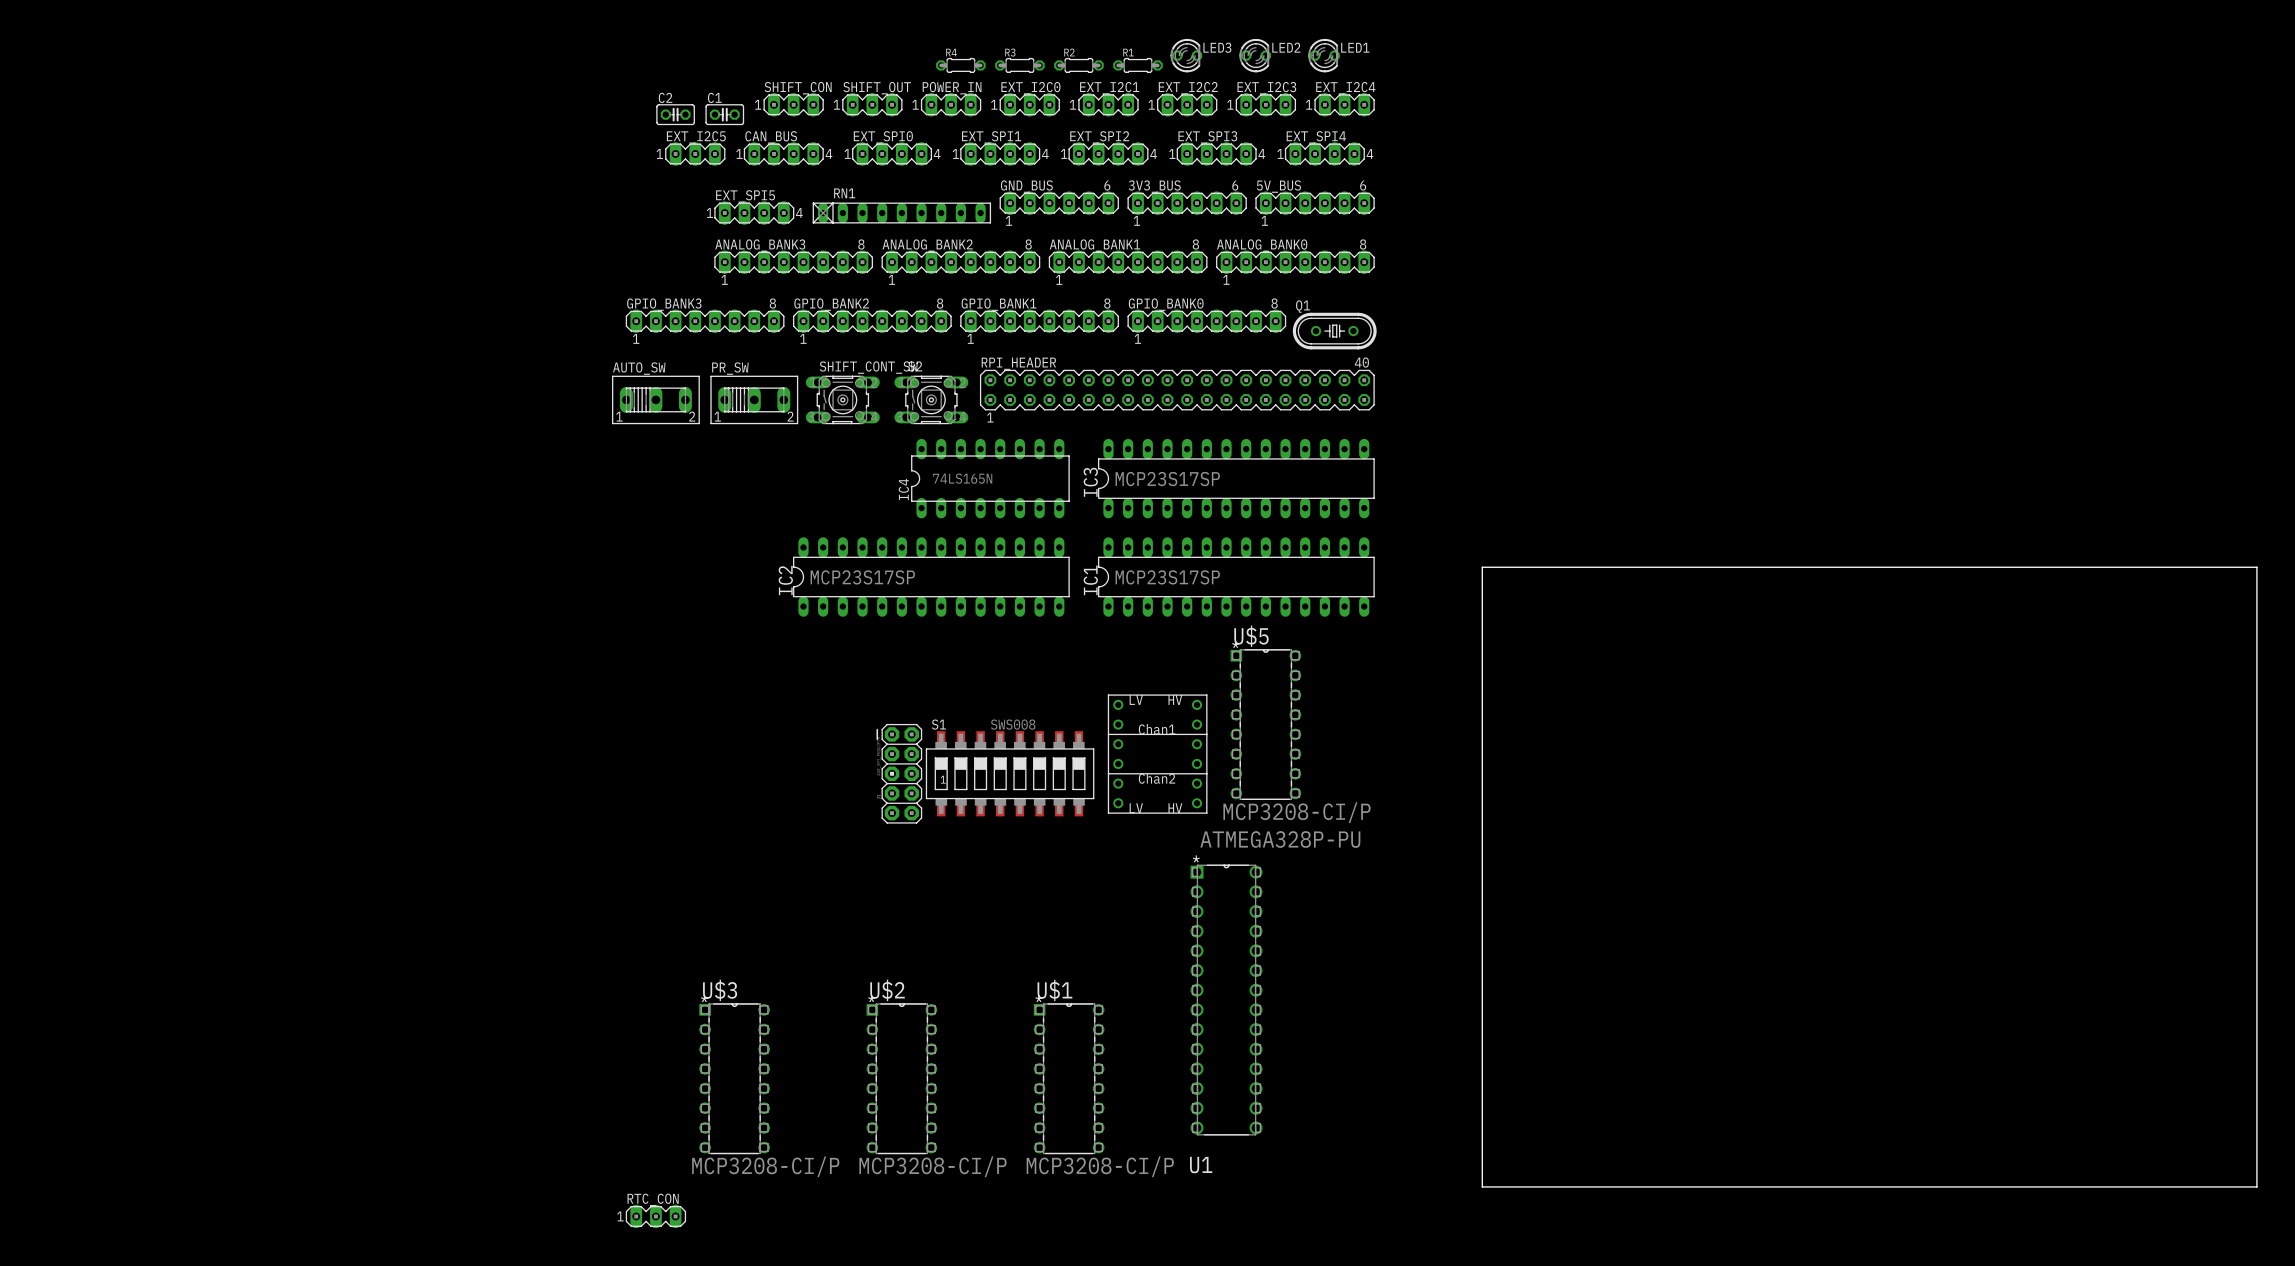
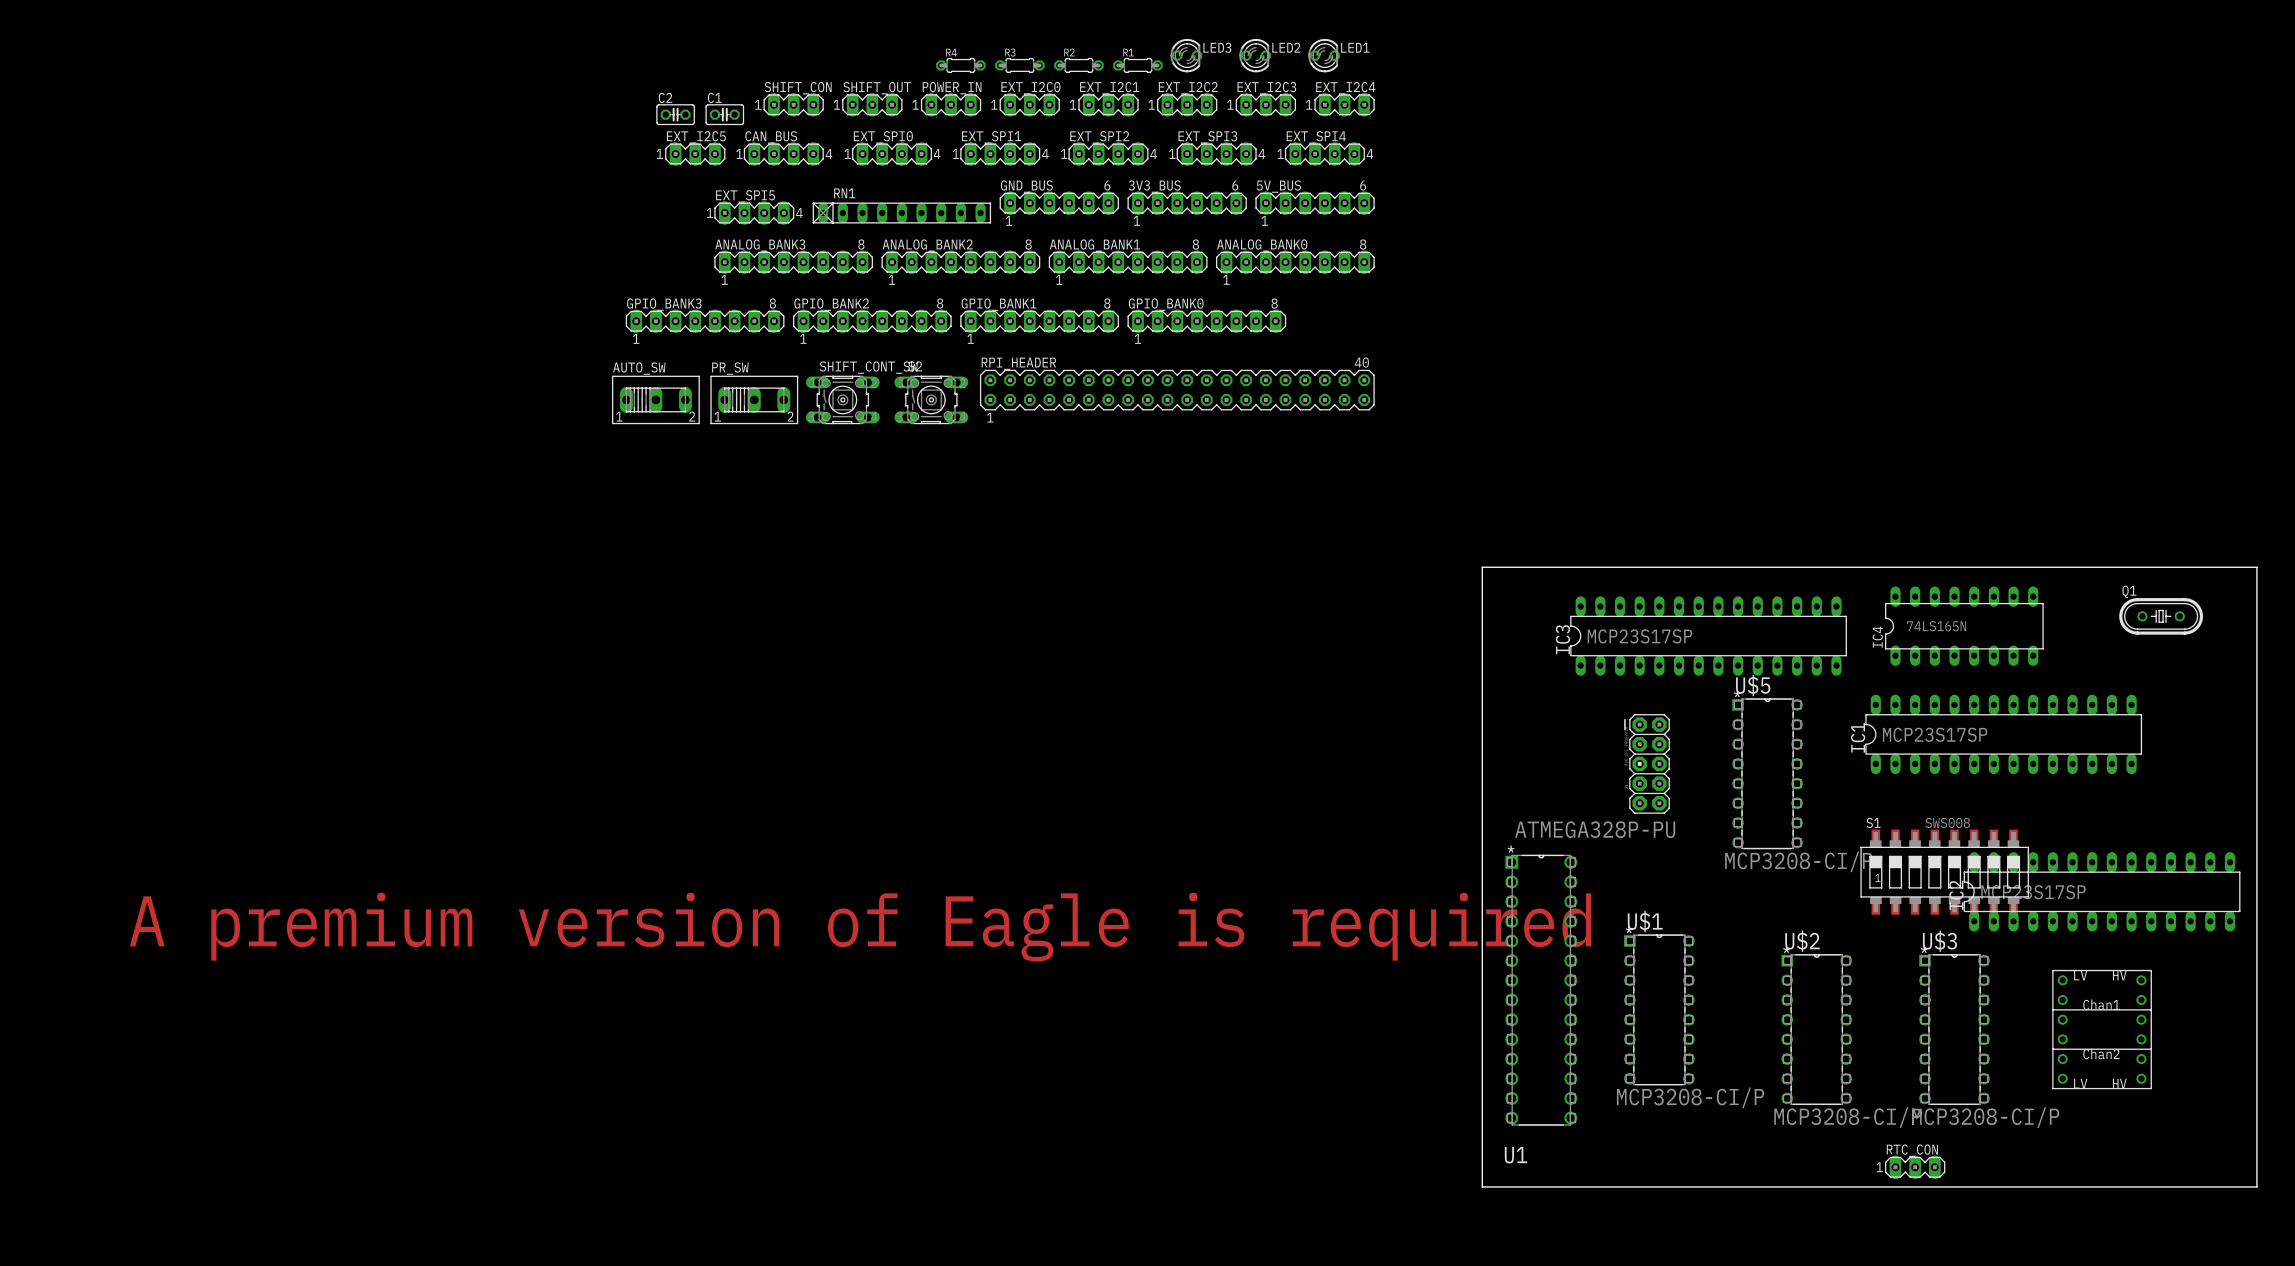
Q1 position: (1334, 331) -> (2161, 616)
IC4 position: (990, 478) -> (1964, 626)
IC3 position: (1236, 478) -> (1708, 636)
IC2 position: (931, 577) -> (2102, 891)
IC1 position: (1236, 577) -> (2003, 734)
U$5 position: (1265, 724) -> (1767, 773)
part: (1157, 754) -> none
part position: (899, 773) -> (1646, 763)
S1 position: (1010, 773) -> (1944, 872)
text: none -> A premium version of Eagle is required (860, 927)
U1 position: (1226, 1000) -> (1541, 990)
part: none -> (2102, 1029)
U$3 position: (734, 1078) -> (1954, 1029)
U$2 position: (901, 1078) -> (1816, 1029)
U$1 position: (1069, 1078) -> (1659, 1009)
RTC_CON: none -> (1915, 1167)
RTC_CON: (655, 1216) -> none

